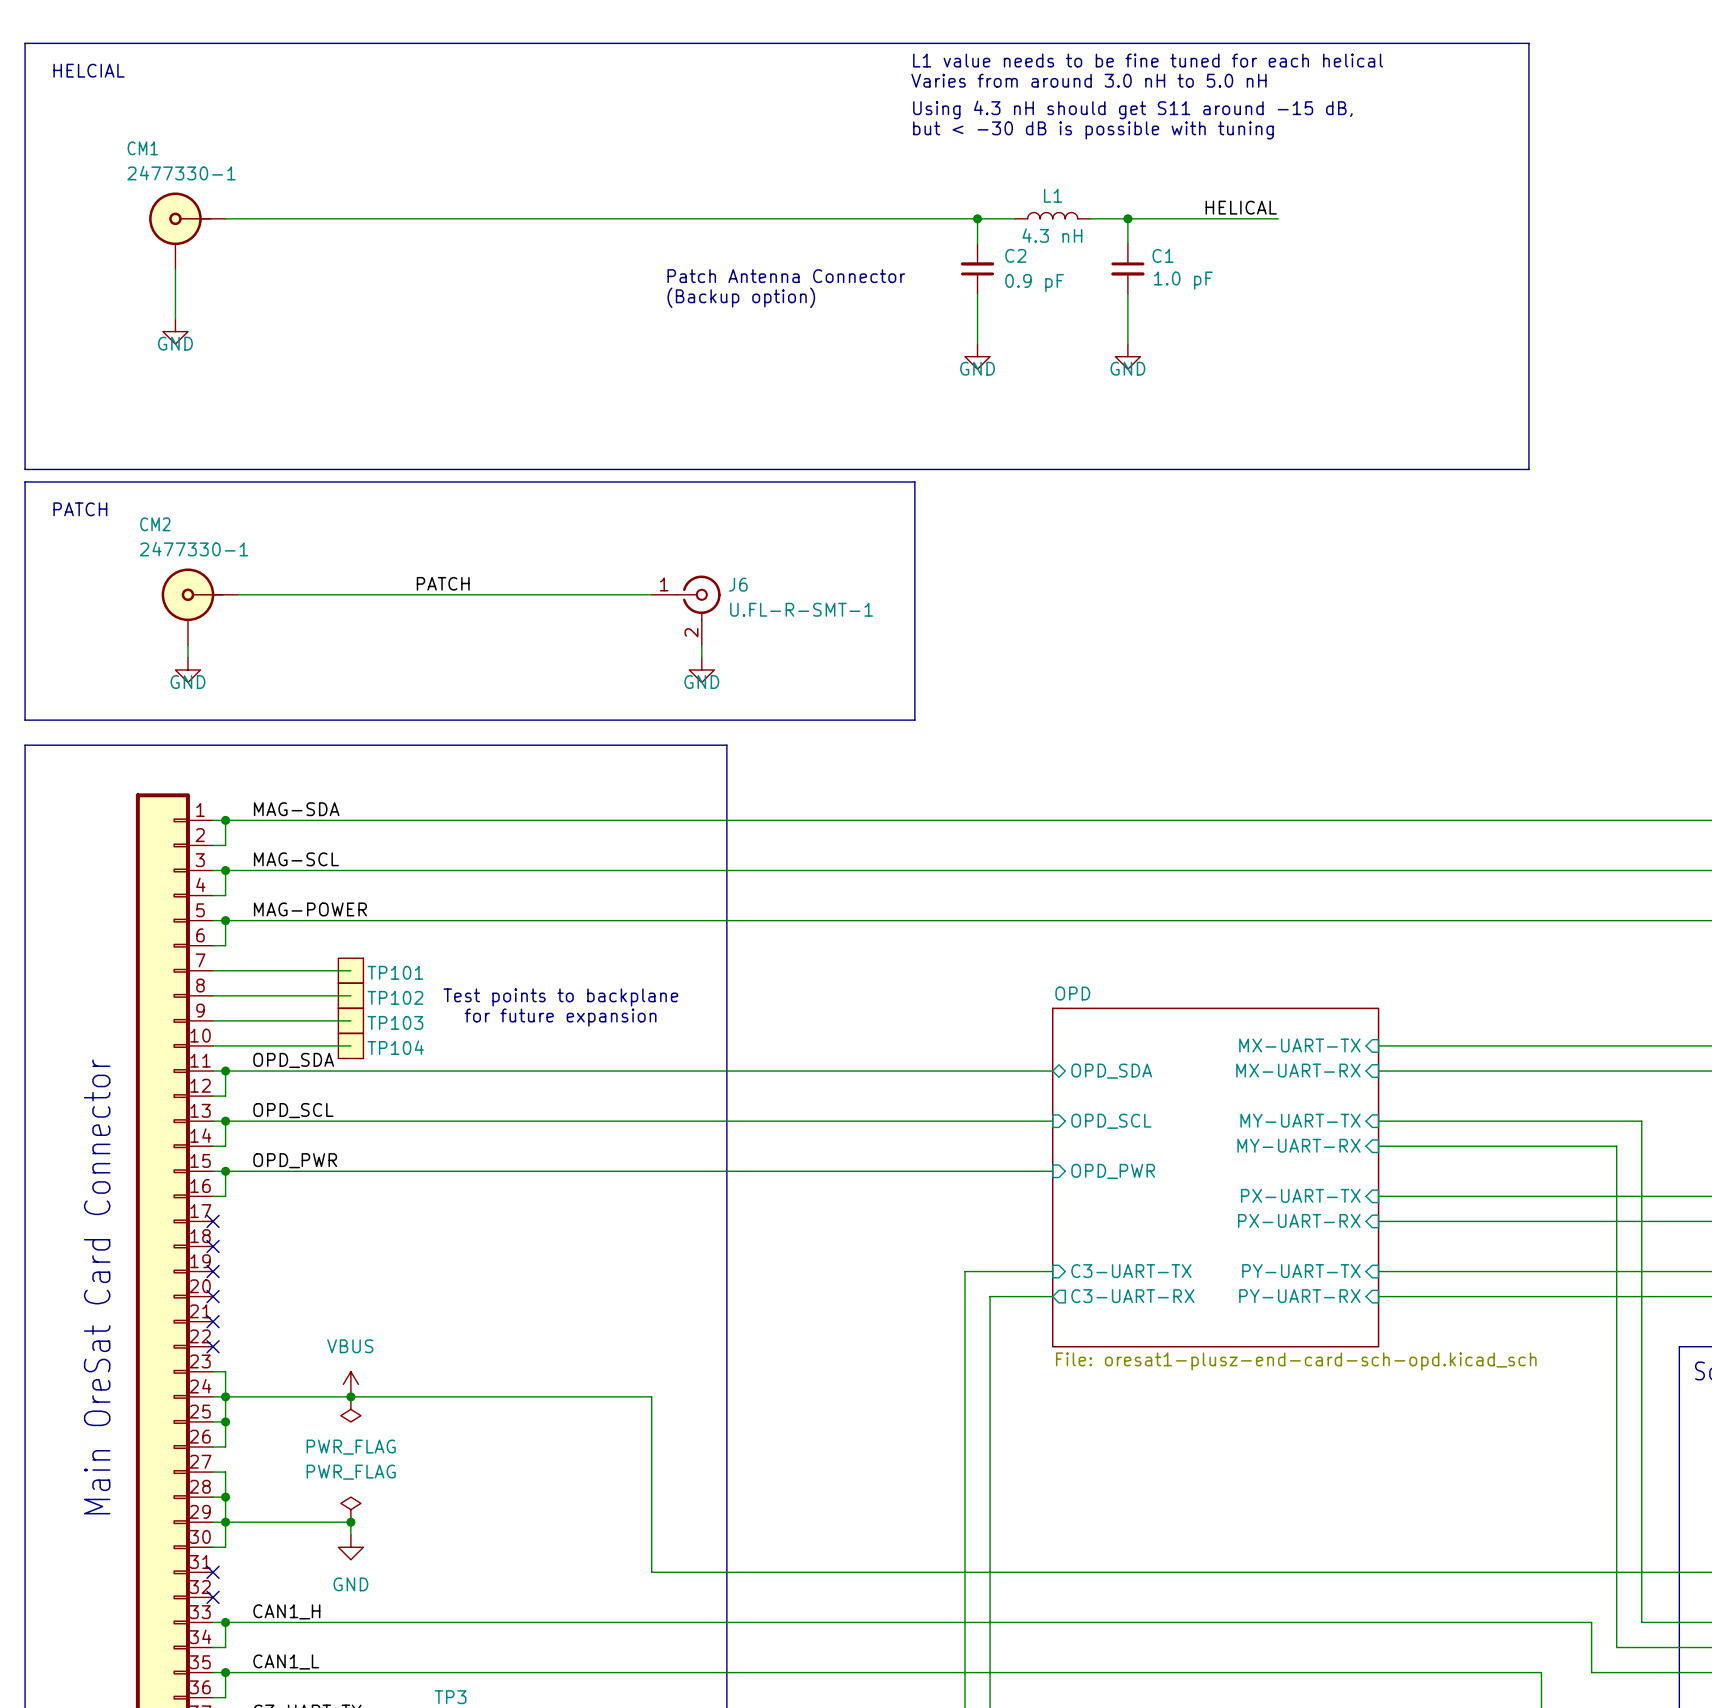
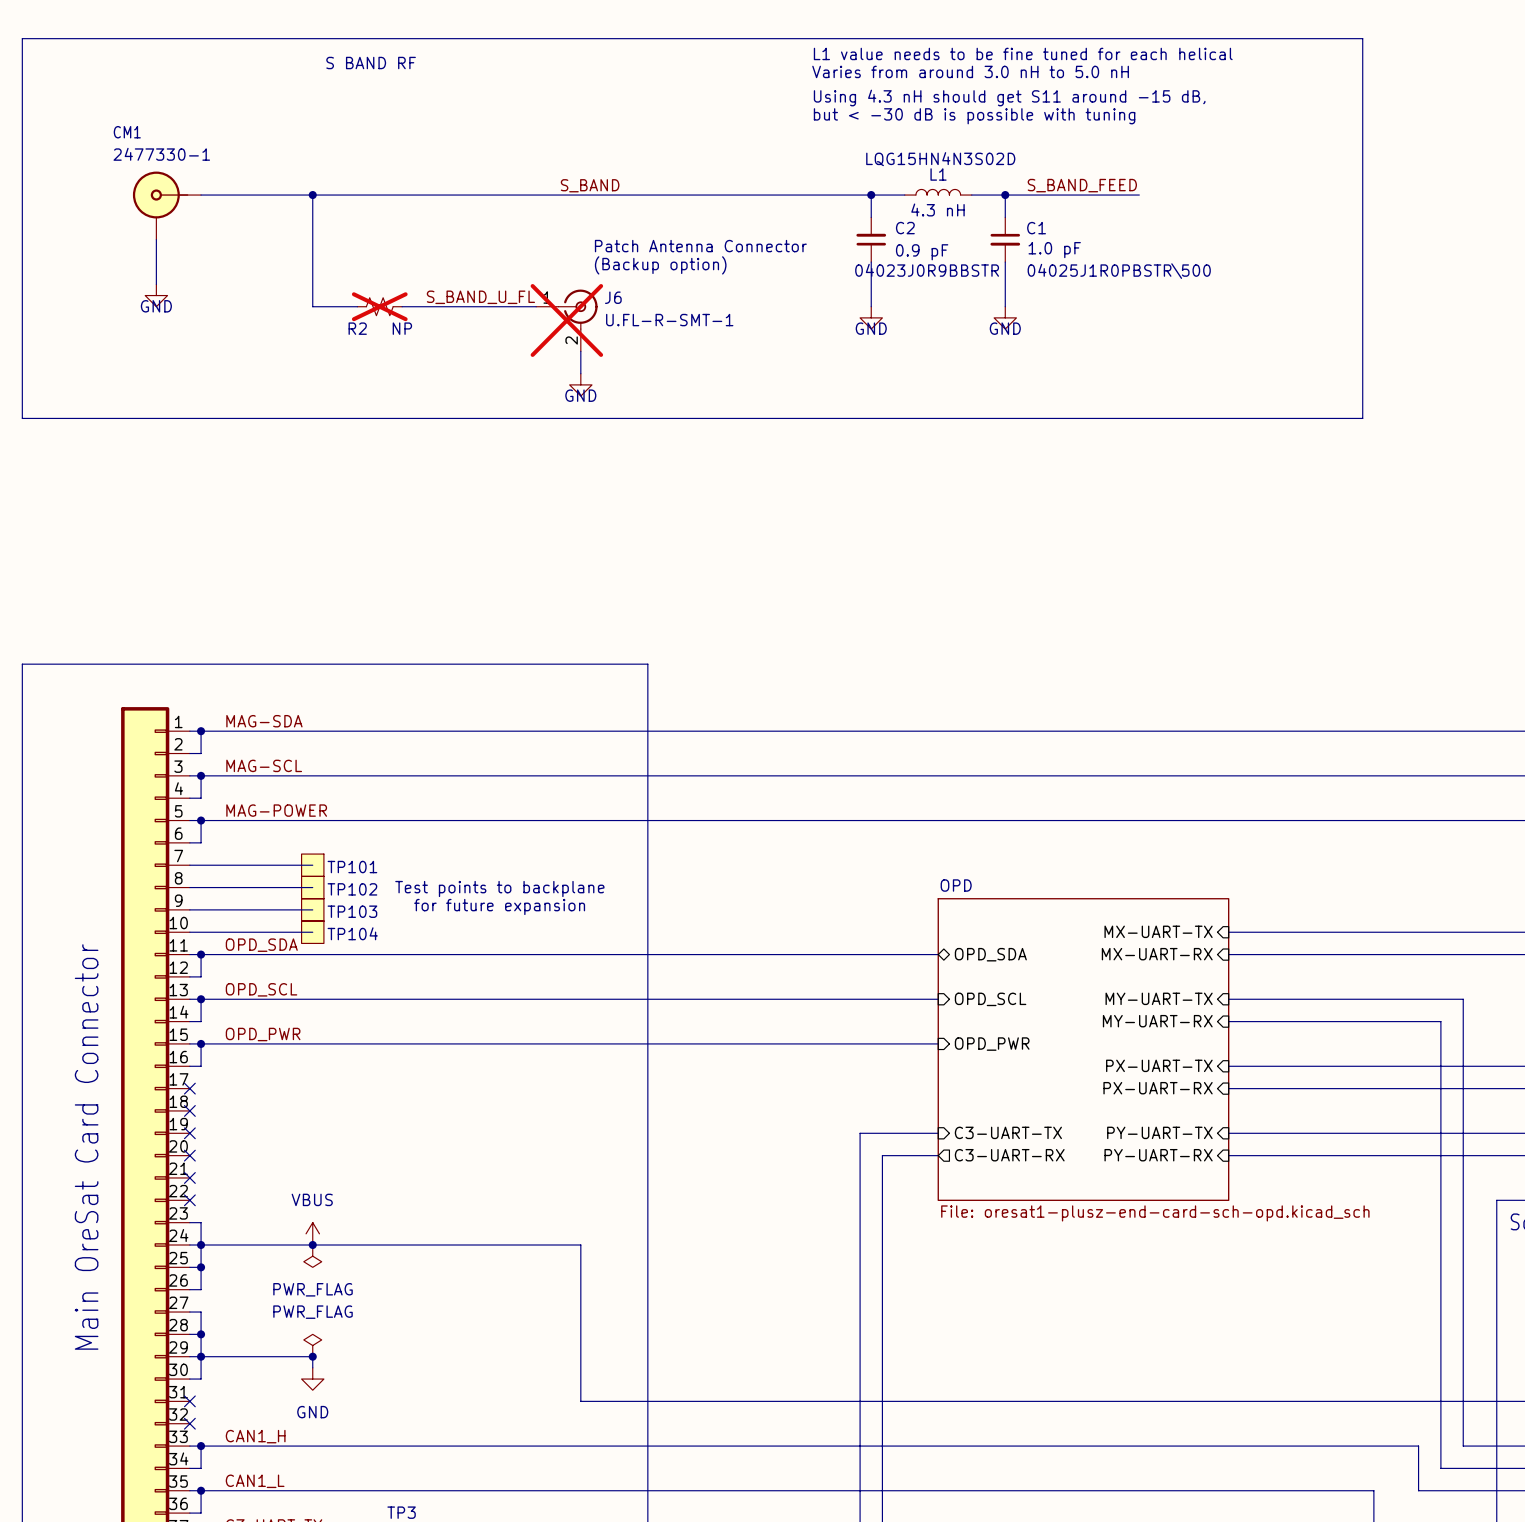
text: HELCIAL (89, 70) -> none
text: none -> S BAND RF (371, 63)
L1 text: none -> LQG15HN4N3S02D (940, 159)
label: HELICAL (1241, 207) -> S_BAND_FEED (1082, 185)
label: none -> S_BAND (590, 185)
wire: none -> (312, 195) (312, 306) (357, 306)
junction: none -> (312, 195)
C2 text: none -> 04023J0R9BBSTR (927, 270)
C1 text: none -> 04025J1R0PBSTR\500 (1119, 271)
label: none -> S_BAND_U_FL (480, 297)
R2: none -> NP (379, 306)
wire: none -> (402, 306) (536, 306)
J6 do-not-place cross: none -> (566, 320)
wire: none -> (580, 351) (580, 373)
line: (25, 482) (25, 720) (914, 720) (914, 482) (25, 482) -> none
text: PATCH (80, 509) -> none
label: PATCH (443, 583) -> none
wire: (238, 594) (651, 594) -> none
CM2: 2477330-1 (199, 606) -> none
J6 position: (686, 610) -> (566, 320)
wire: (187, 644) (187, 657) -> none
wire: (701, 644) (701, 657) -> none
power symbol: GND (187, 669) -> none
power symbol position: GND (701, 669) -> GND (580, 384)

